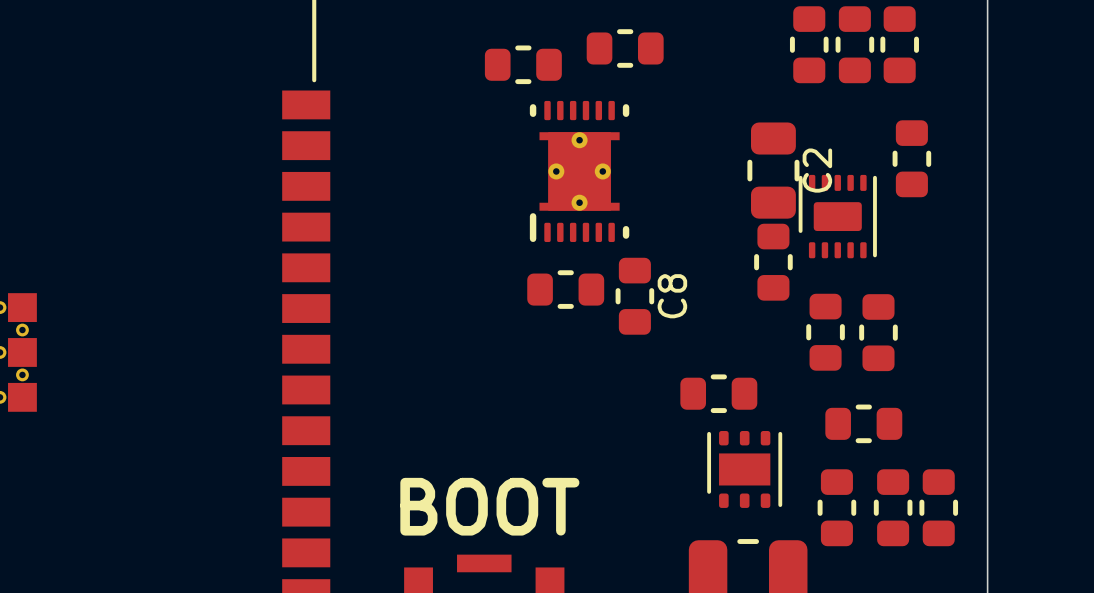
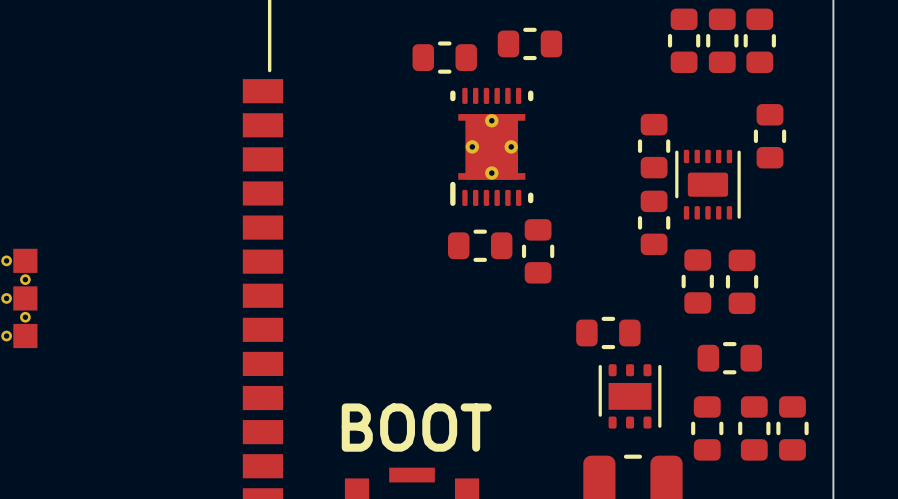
C2: (773, 170) -> none
part: none -> (654, 146)
C8 name: C8 (672, 296) -> none

